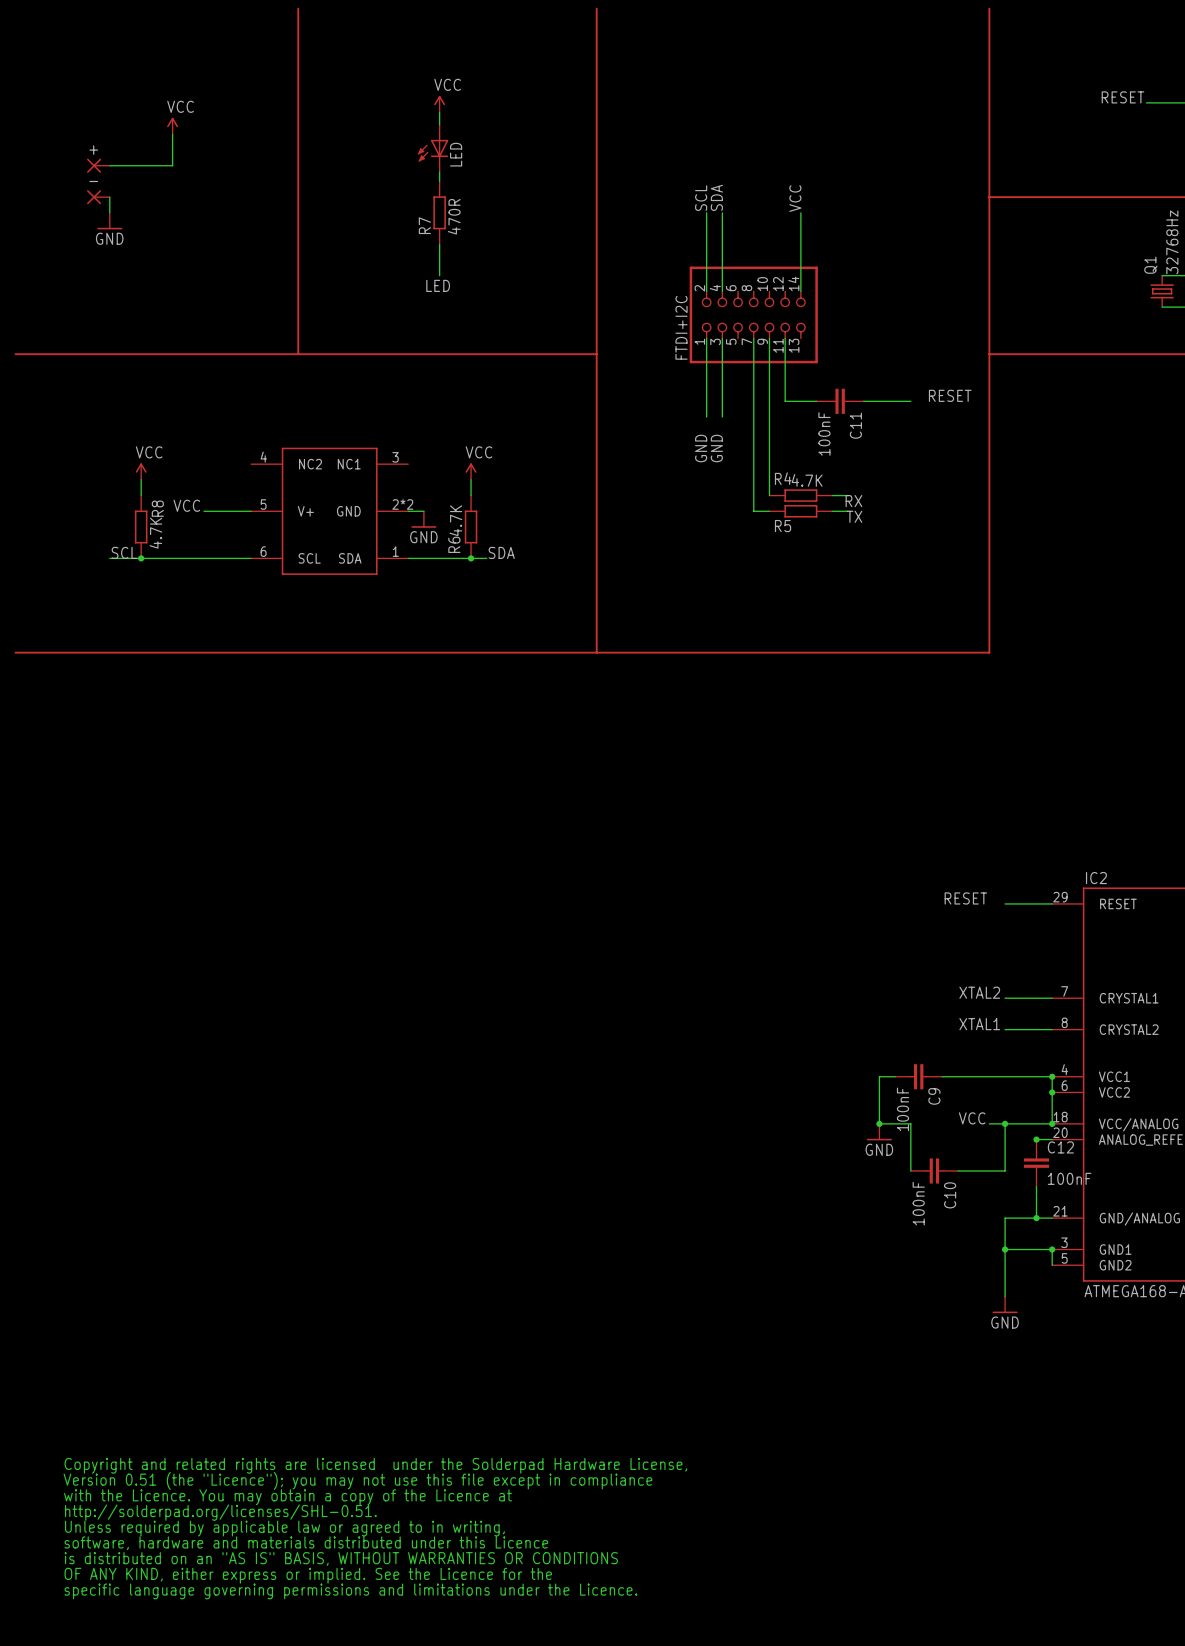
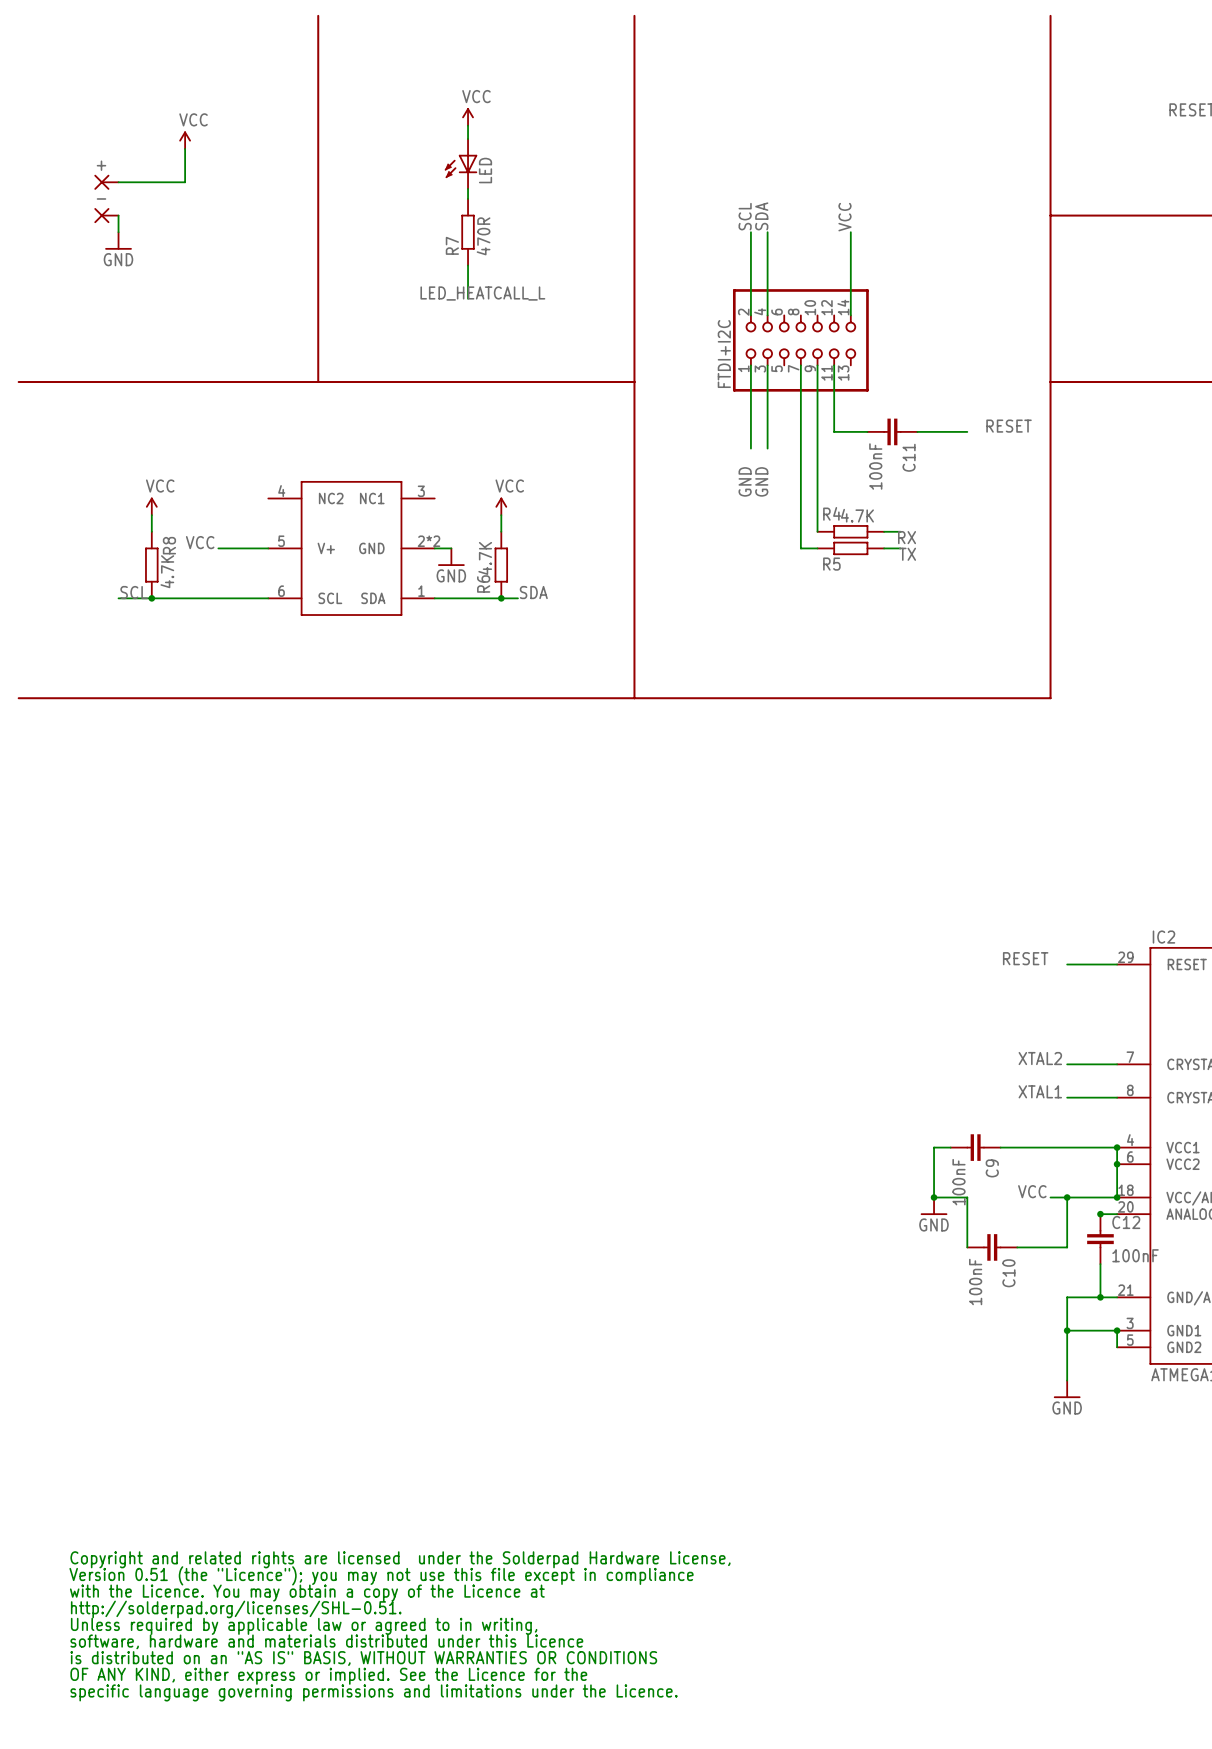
label: none -> LED_HEATCALL_L (482, 293)
label: LED (438, 285) -> none

